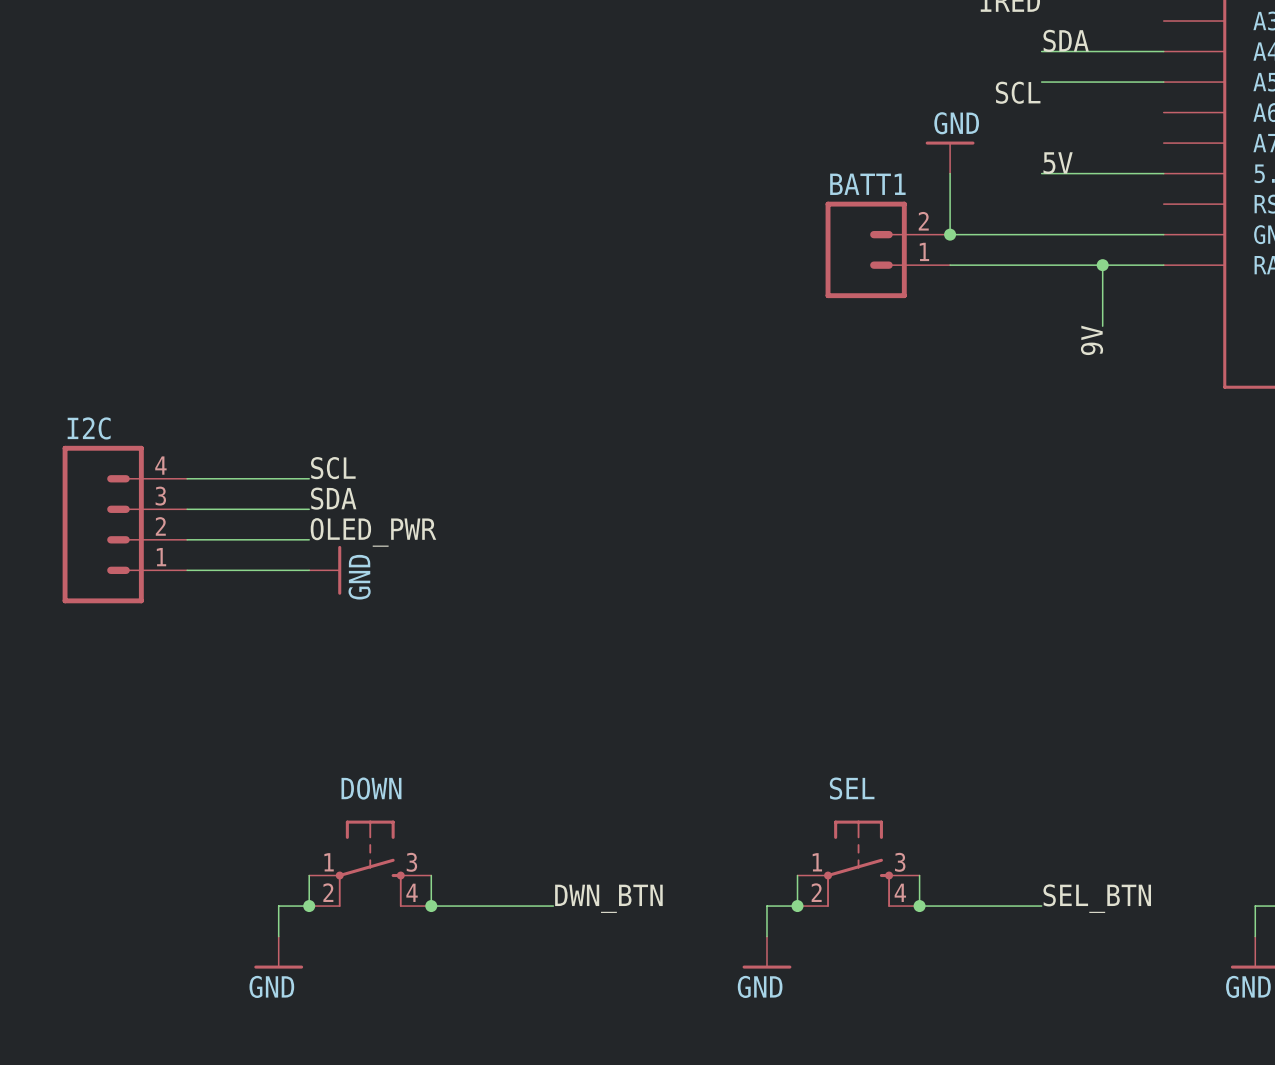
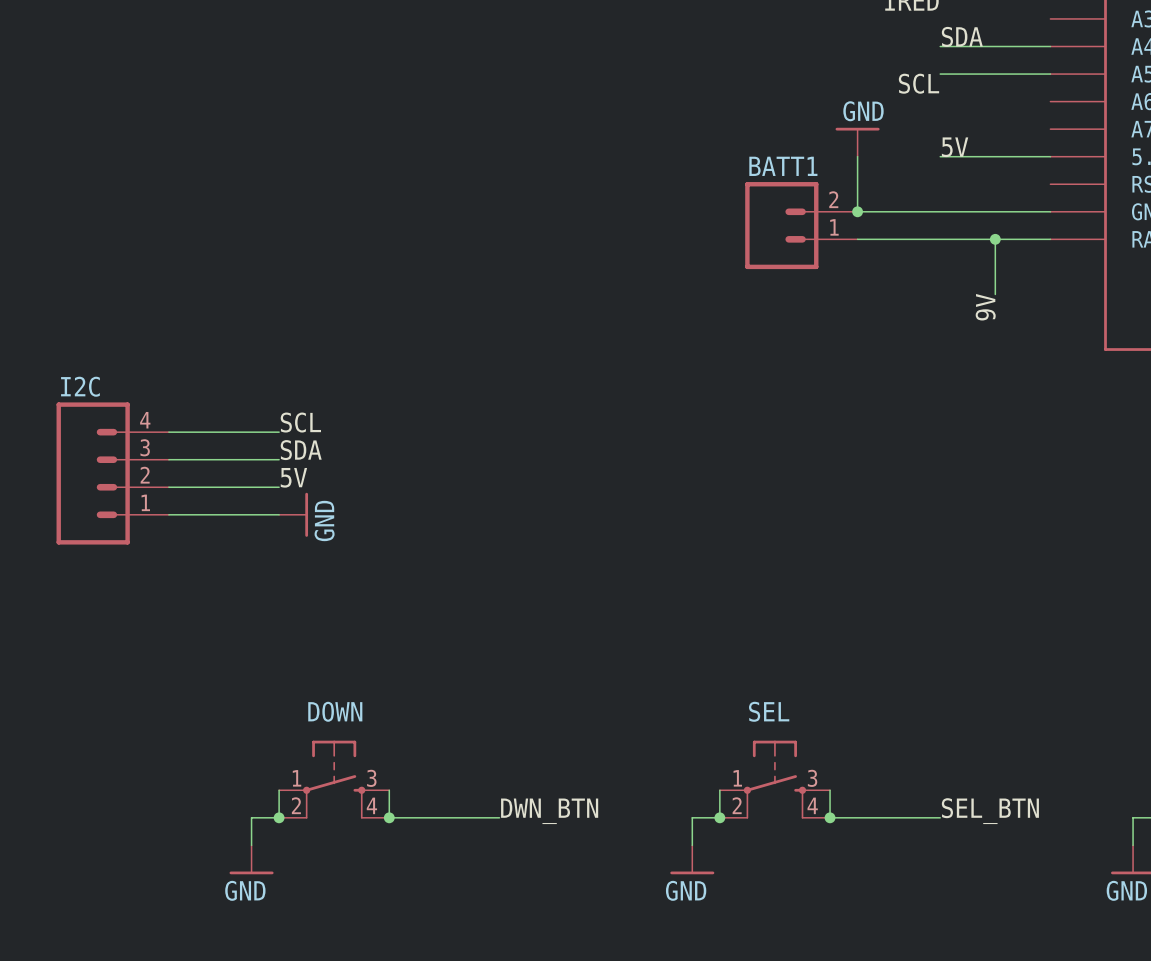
label: OLED_PWR (373, 532) -> 5V (293, 477)

